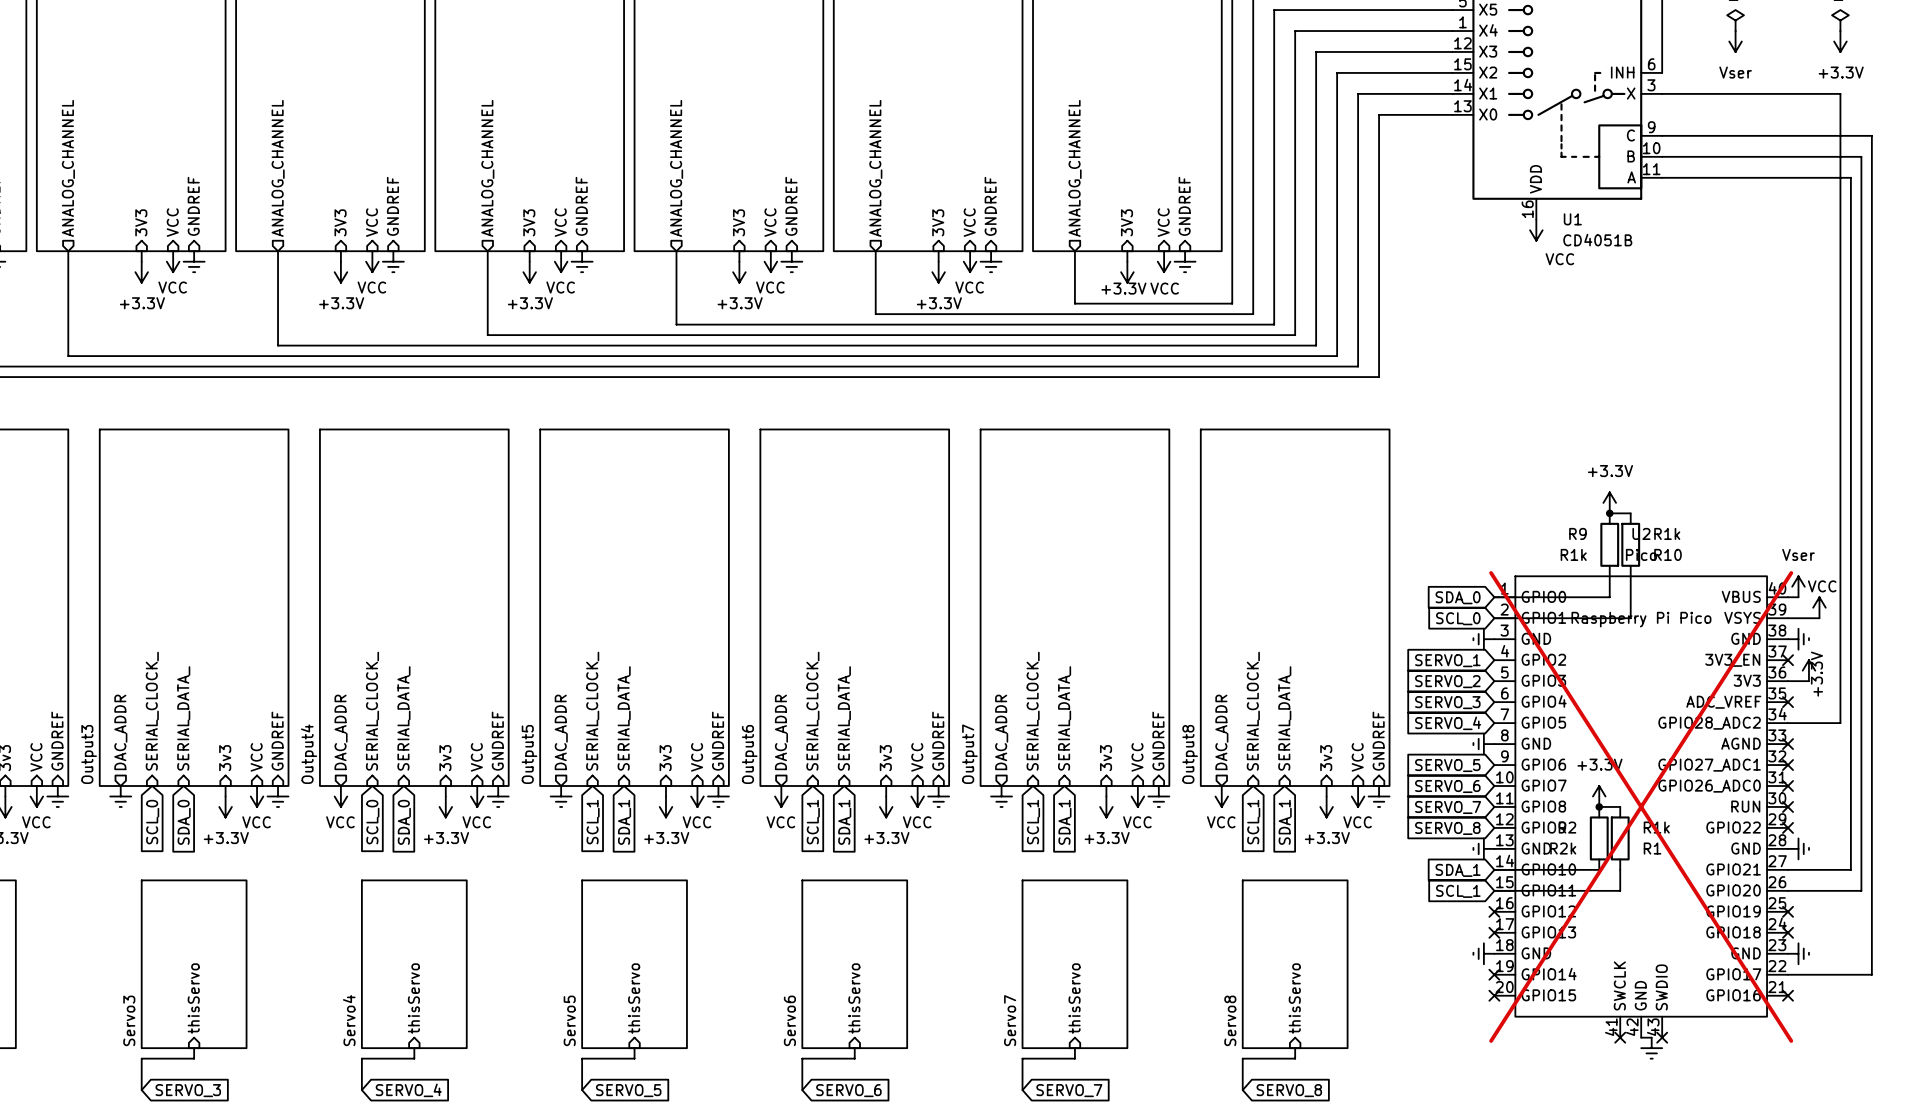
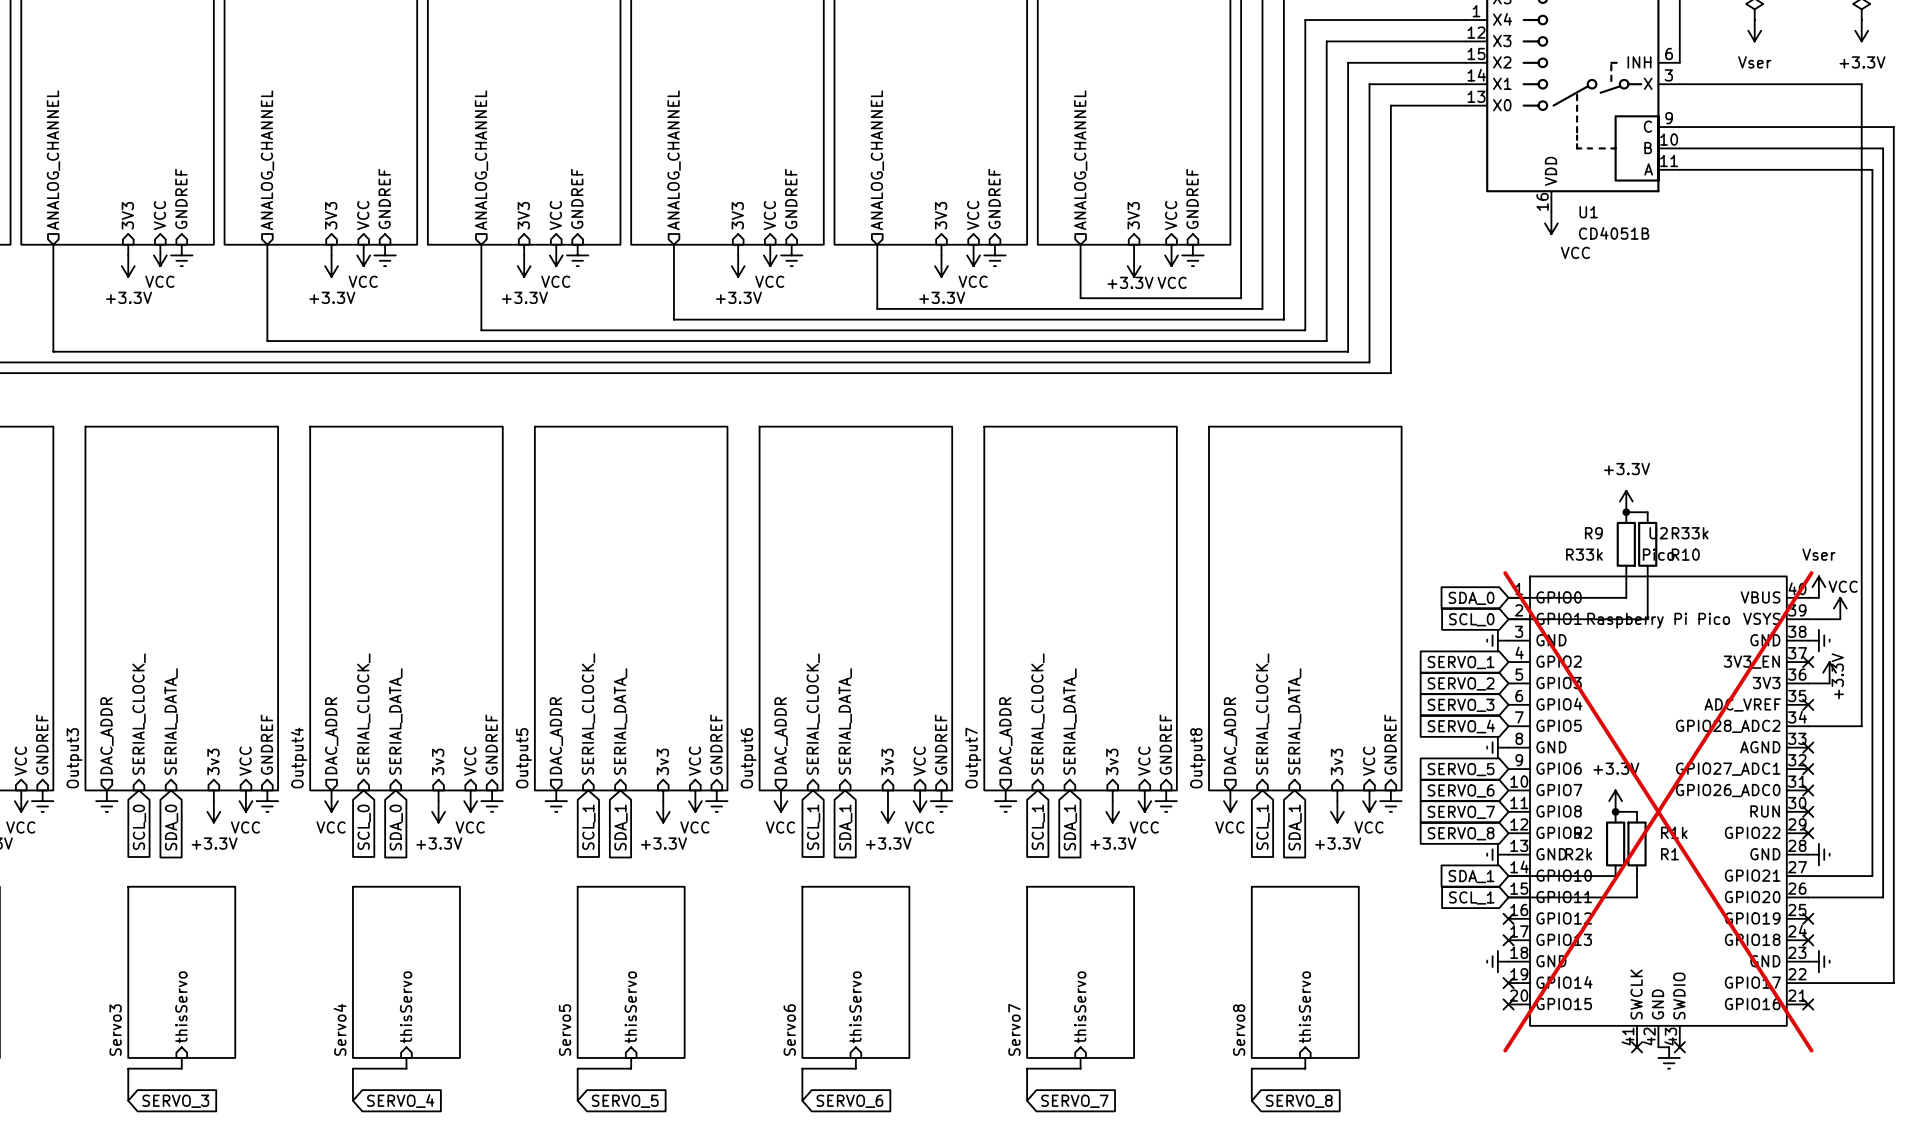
R10 value: R1k (1667, 533) -> R33k (1690, 533)
R9 value: R1k (1573, 554) -> R33k (1584, 554)

